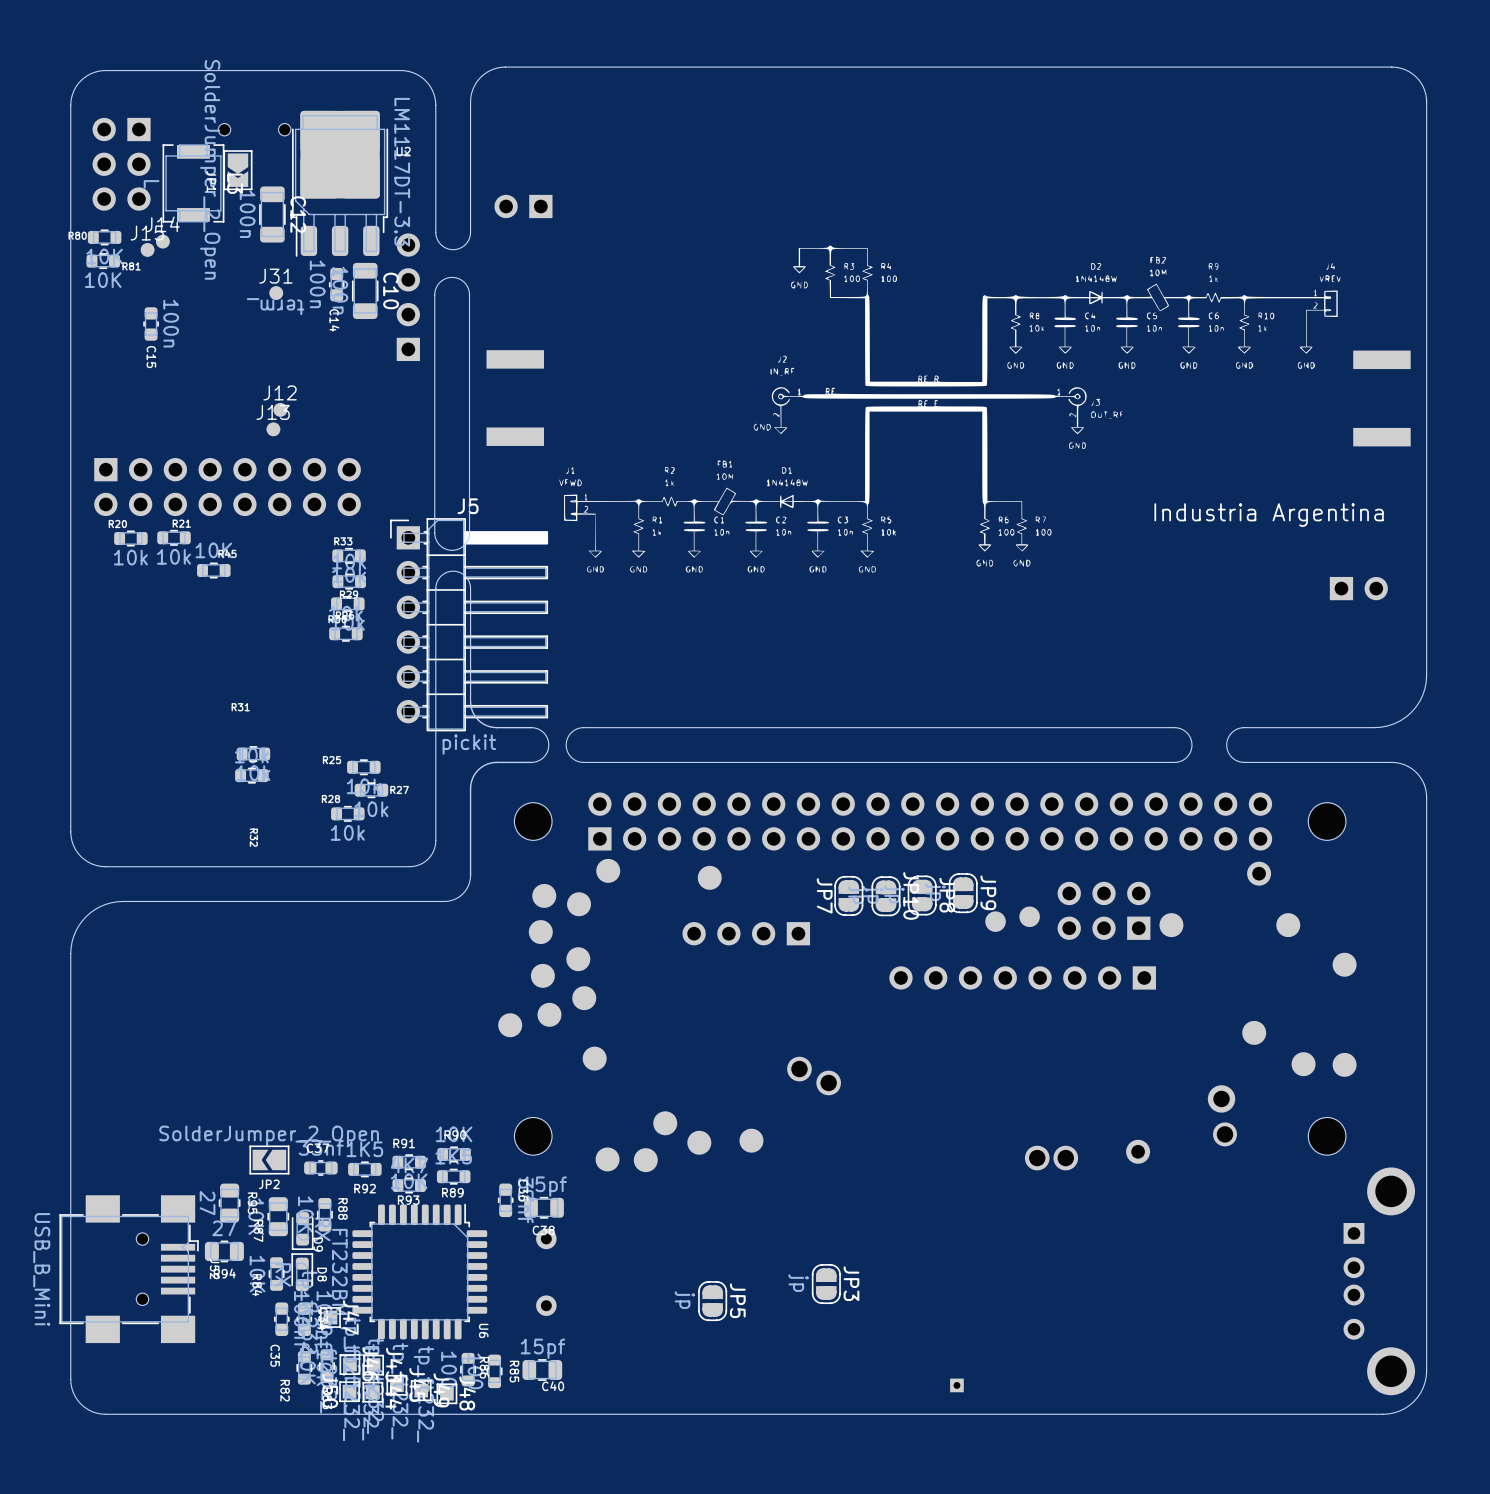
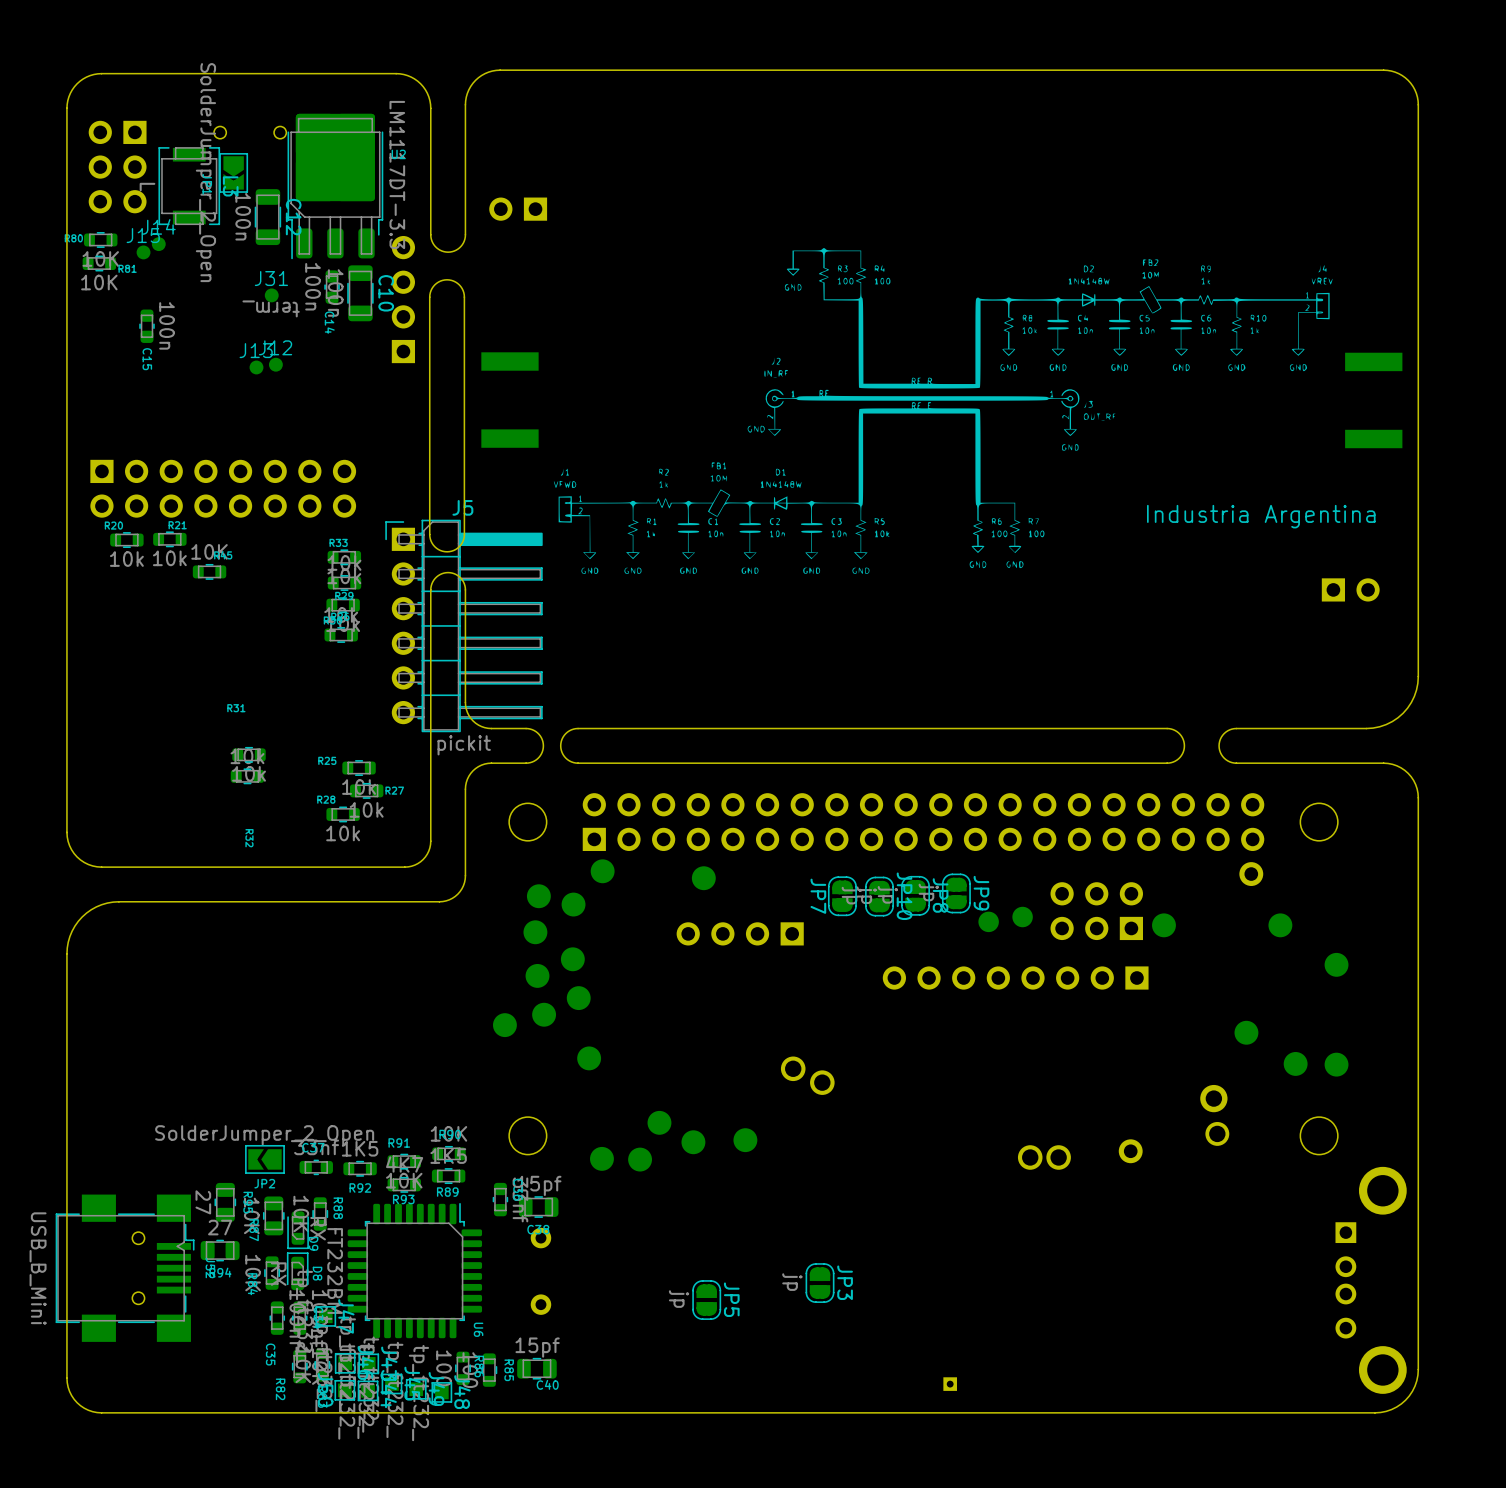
J12 position: (280, 409) -> (275, 364)
J13 position: (273, 429) -> (256, 367)

